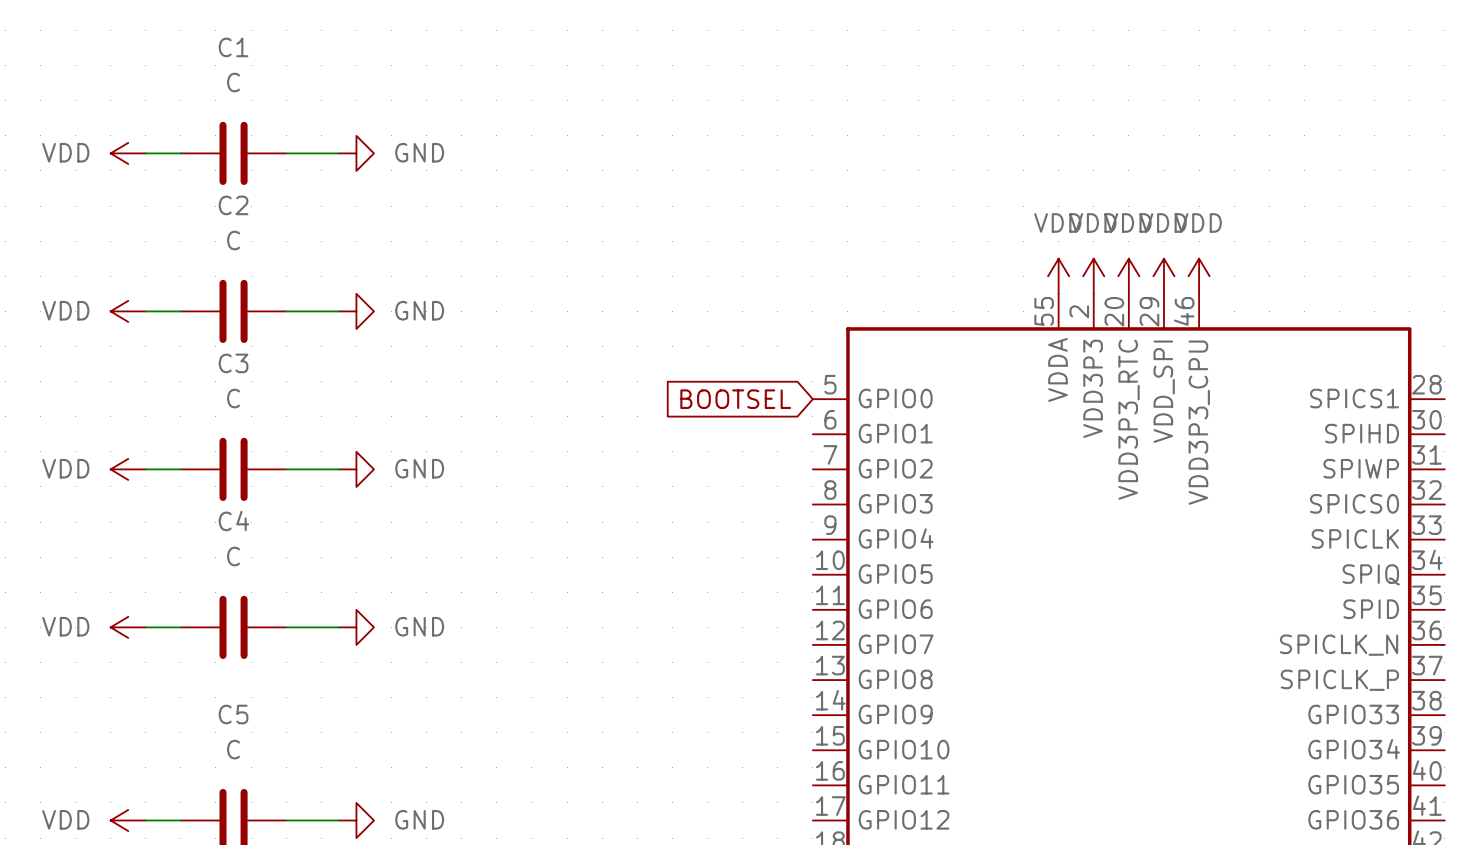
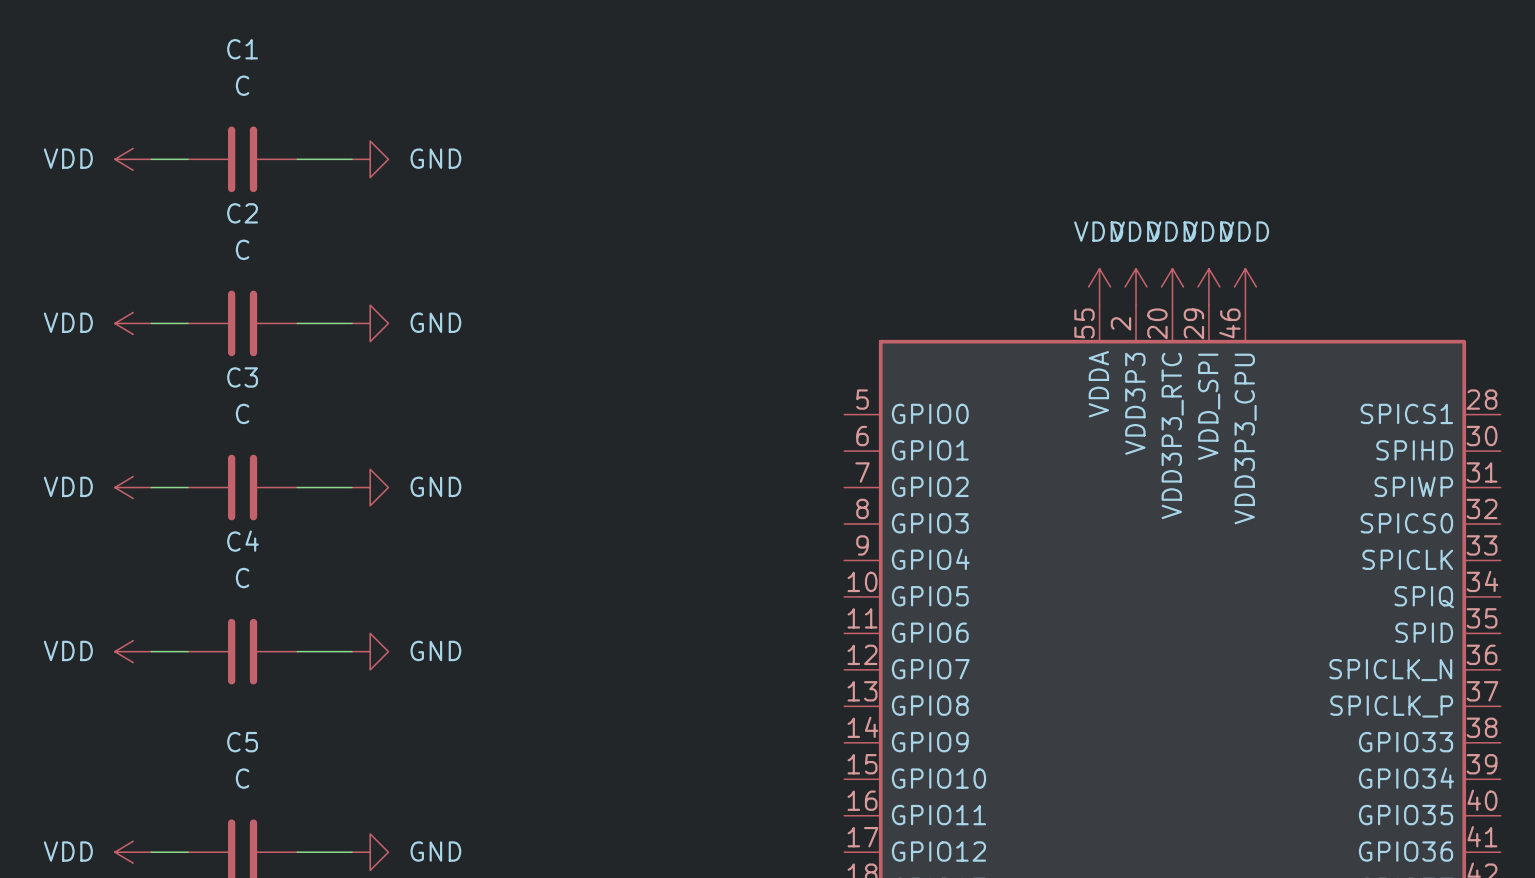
global label: BOOTSEL (735, 399) -> none

